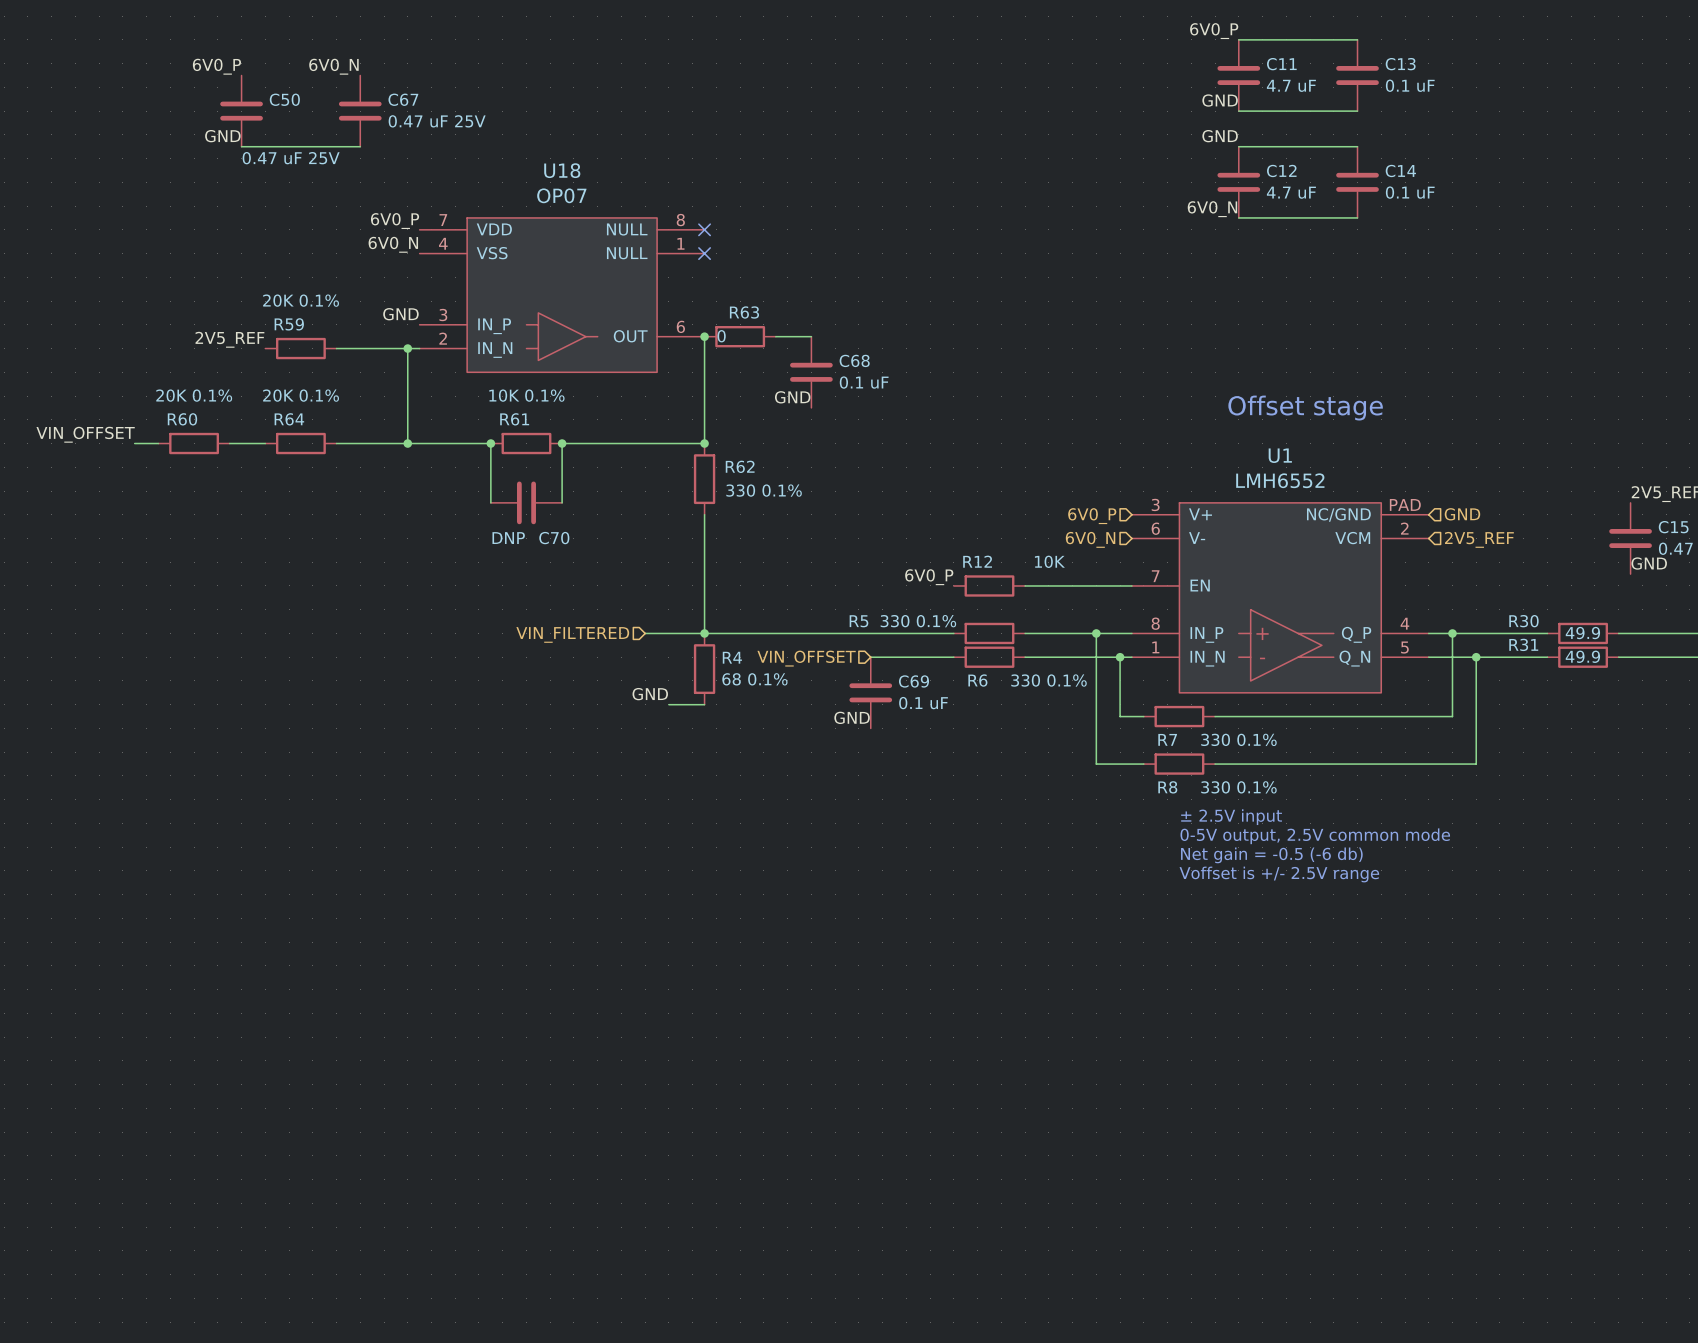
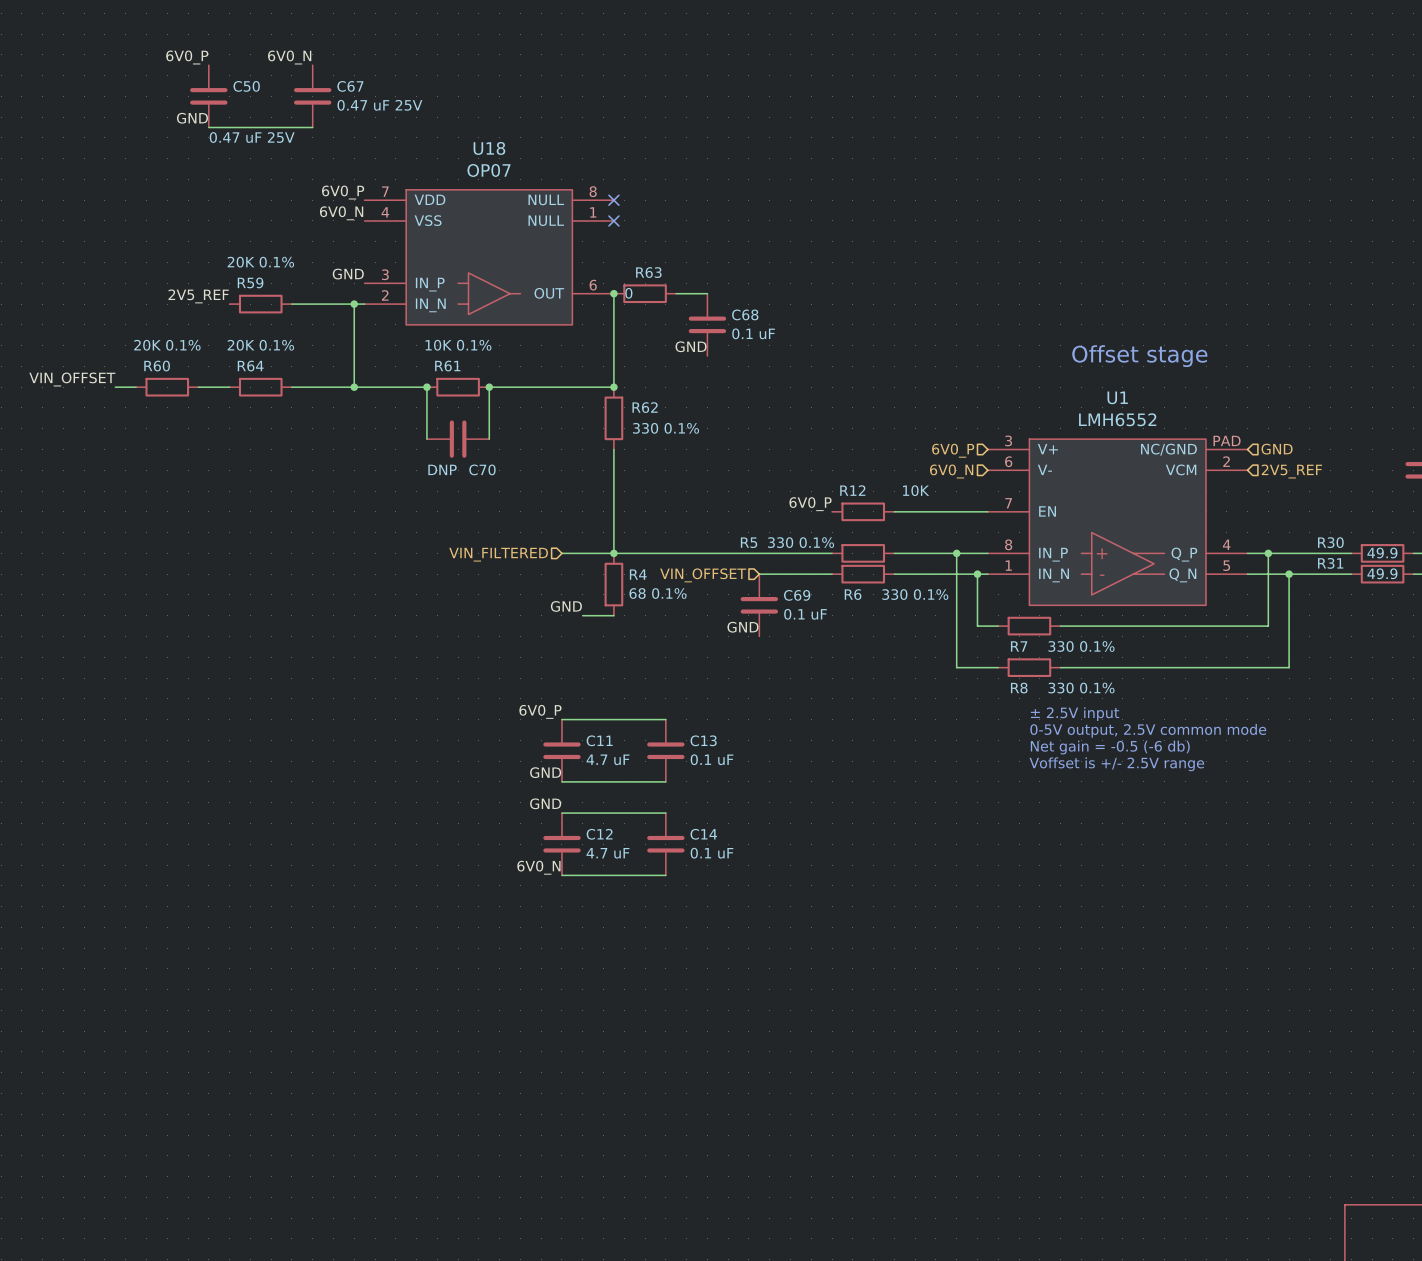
label: 6V0_P (1214, 31) -> none
wire: (1238, 39) (1357, 39) -> none
C11 position: (1238, 75) -> (561, 750)
C13 position: (1357, 75) -> (665, 750)
label: GND (1220, 100) -> none
wire: (1238, 111) (1357, 111) -> none
label: GND (1220, 136) -> none
wire: (1238, 146) (1357, 146) -> none
C12 position: (1238, 182) -> (561, 844)
C14 position: (1357, 182) -> (665, 844)
label: 6V0_N (1212, 209) -> none
wire: (1238, 217) (1357, 217) -> none
label: none -> 6V0_P (540, 711)
wire: none -> (561, 719) (665, 719)
label: none -> GND (545, 772)
wire: none -> (561, 781) (665, 781)
label: none -> GND (545, 803)
wire: none -> (561, 813) (665, 813)
label: none -> 6V0_N (538, 867)
wire: none -> (561, 875) (665, 875)

